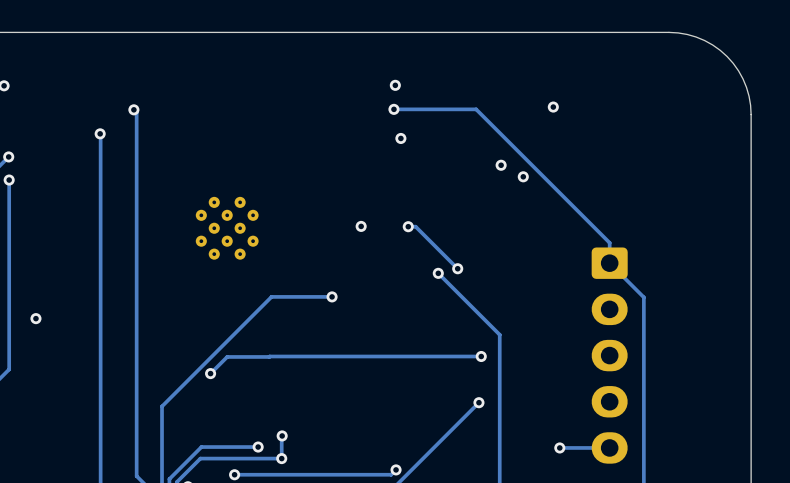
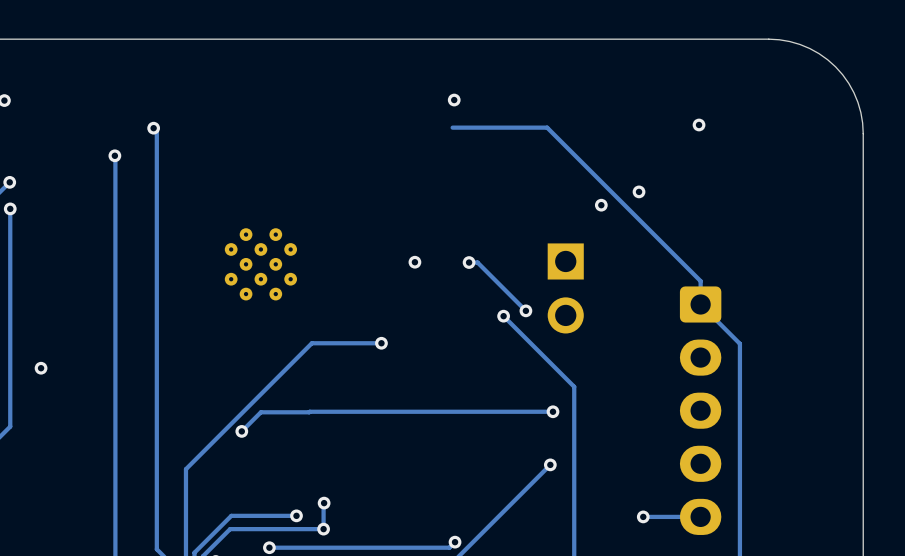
via: (553, 107) -> none
via: none -> (699, 124)
via: (393, 109) -> none
via: (400, 138) -> none
via: (501, 165) -> none
via: none -> (639, 191)
part: none -> (565, 288)

